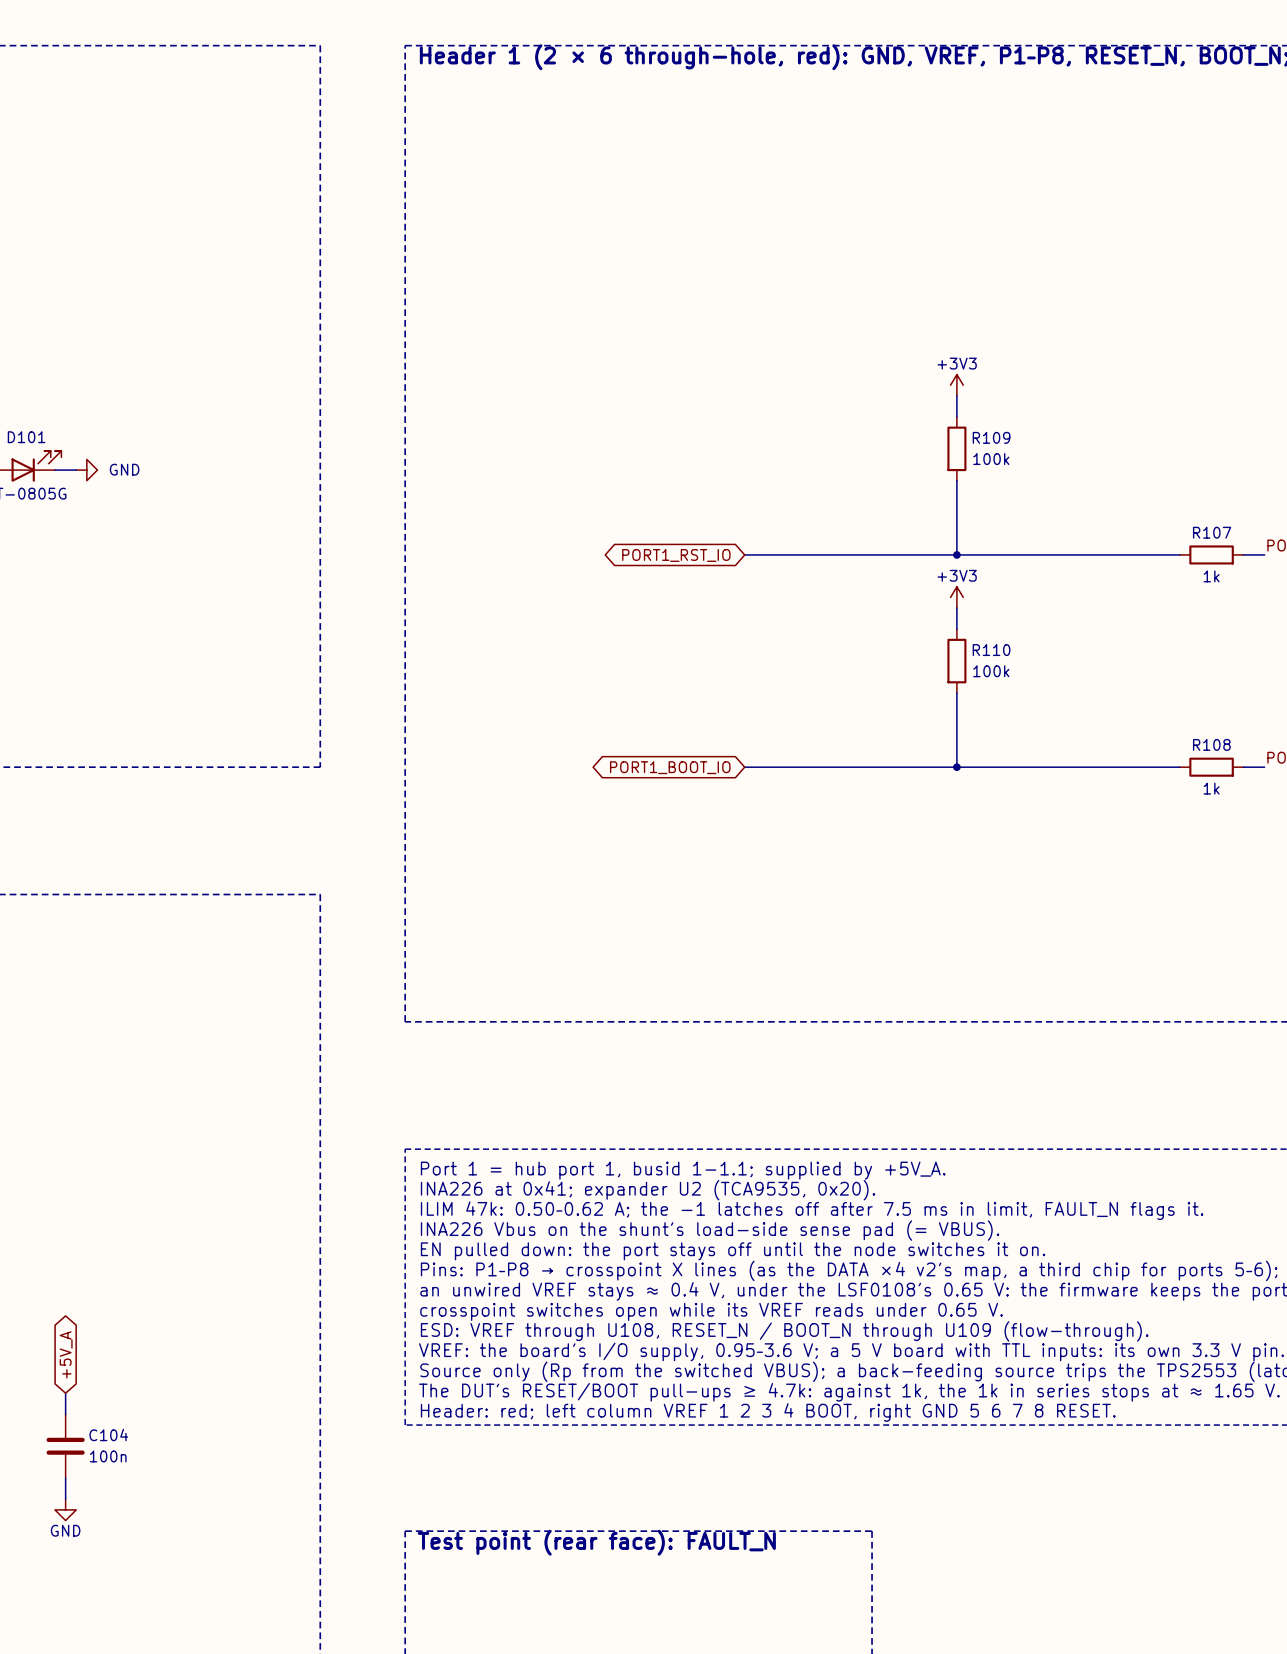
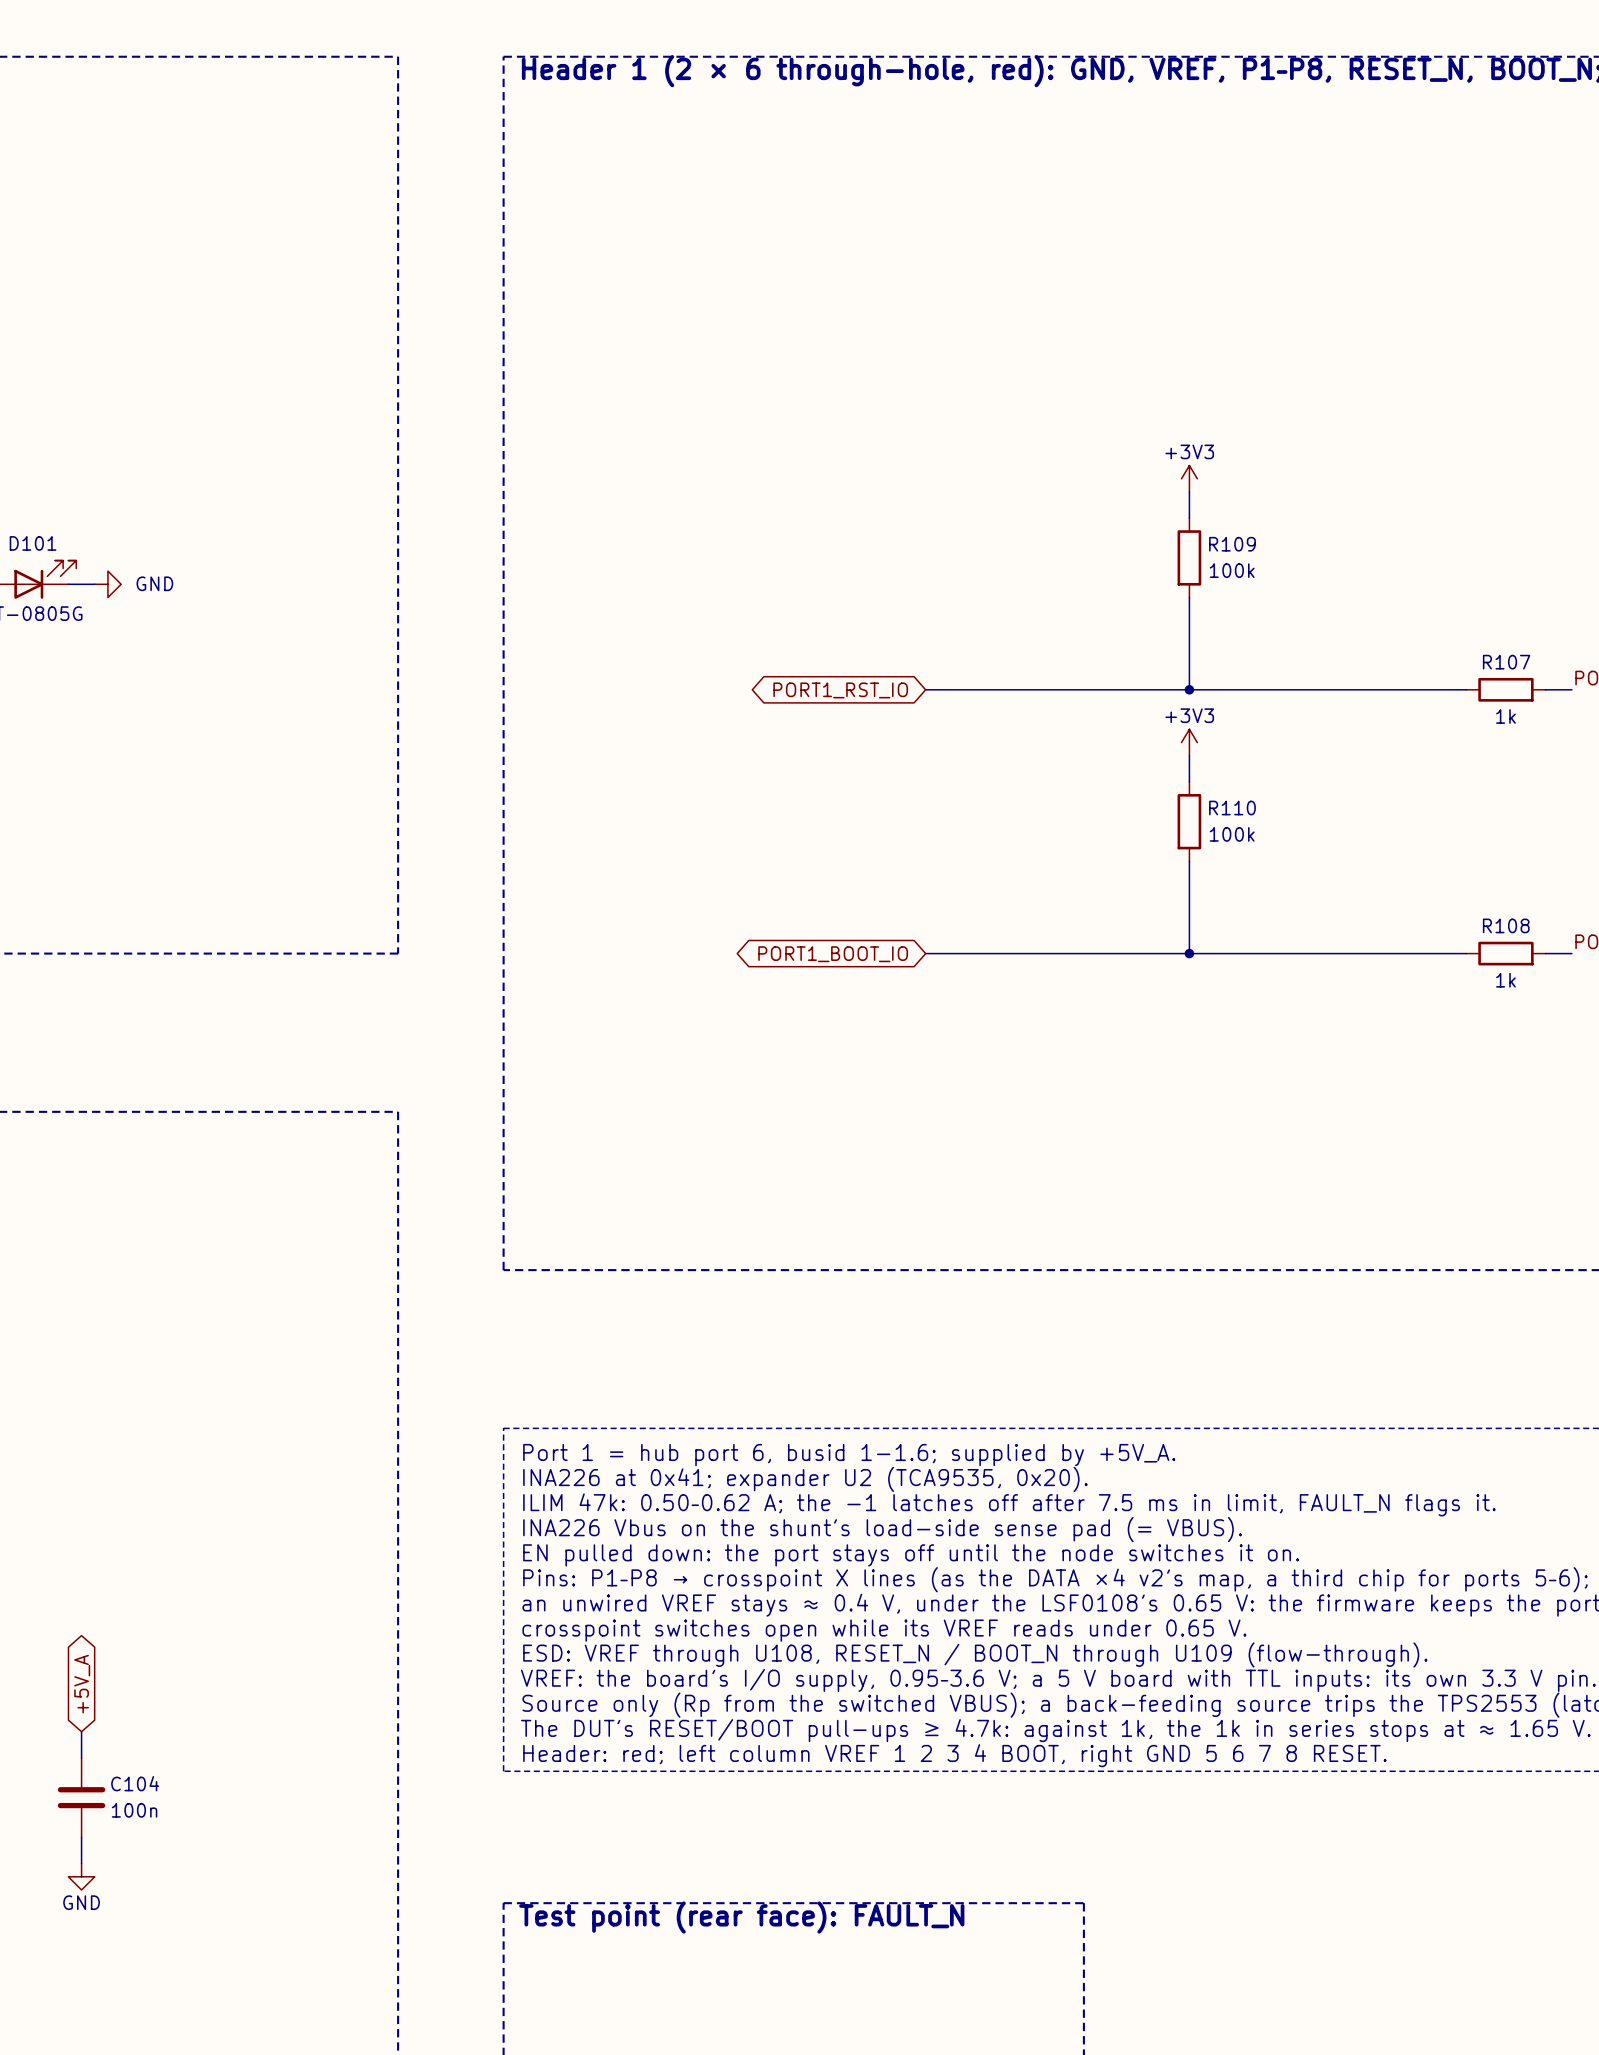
text: Port 1 = hub port 1, busid 1-1.1; supplied by +5V_A. (683, 1170) -> Port 1 = hub port 6, busid 1-1.6; supplied by +5V_A. (849, 1455)

